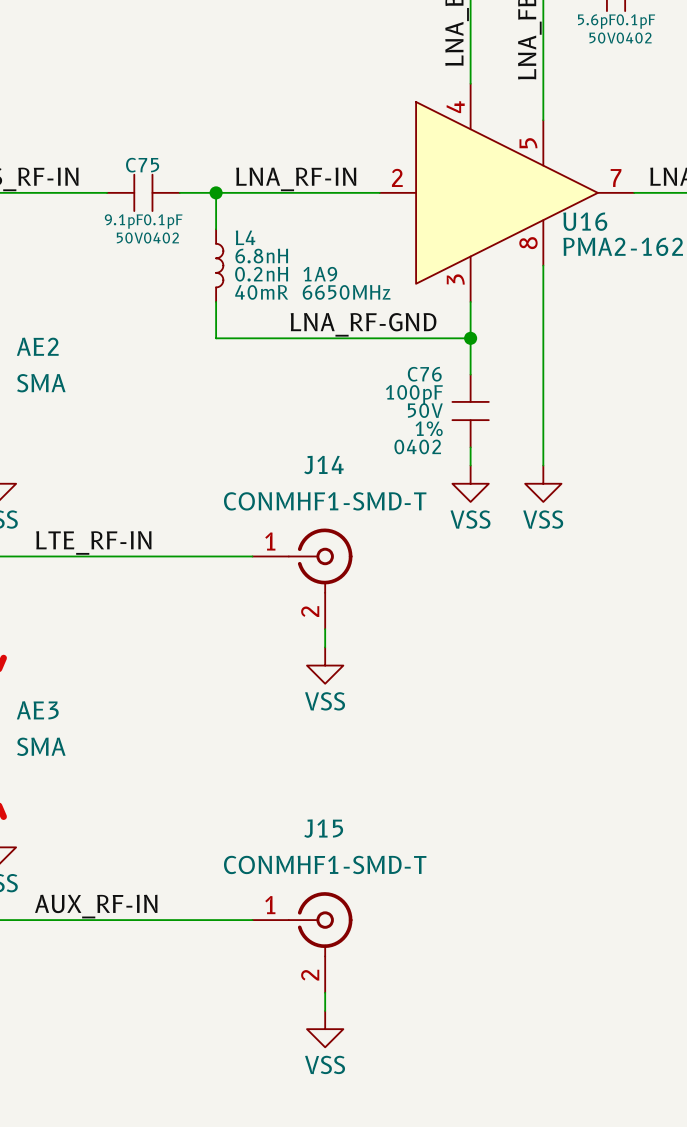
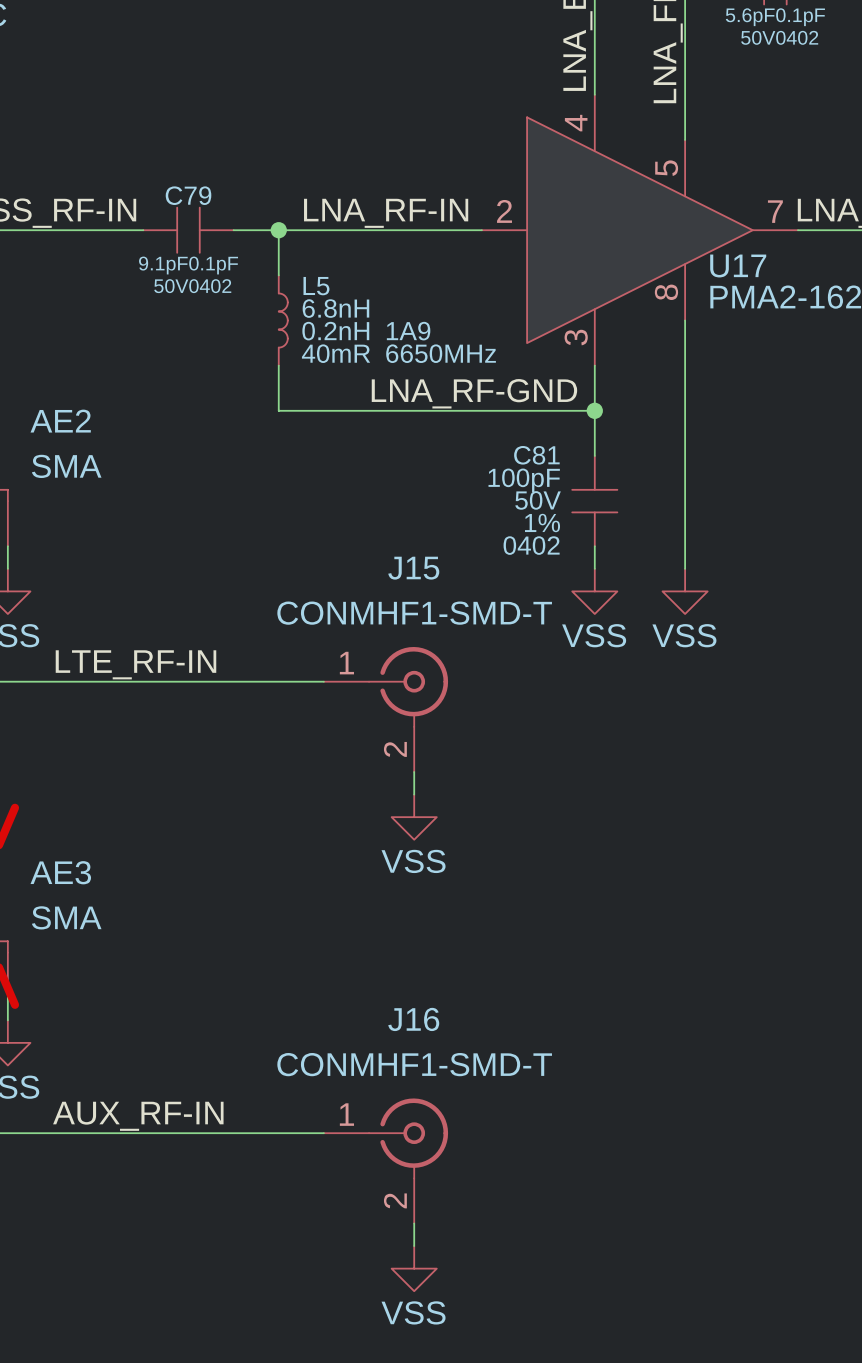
C75 name: C75 (142, 165) -> C79 (188, 195)
U16 name: U16 (585, 221) -> U17 (738, 266)
L4 name: L4 (245, 237) -> L5 (316, 286)
C76 name: C76 (424, 374) -> C81 (536, 455)
J14 name: J14 (323, 465) -> J15 (413, 568)
J15 name: J15 (323, 828) -> J16 (413, 1019)

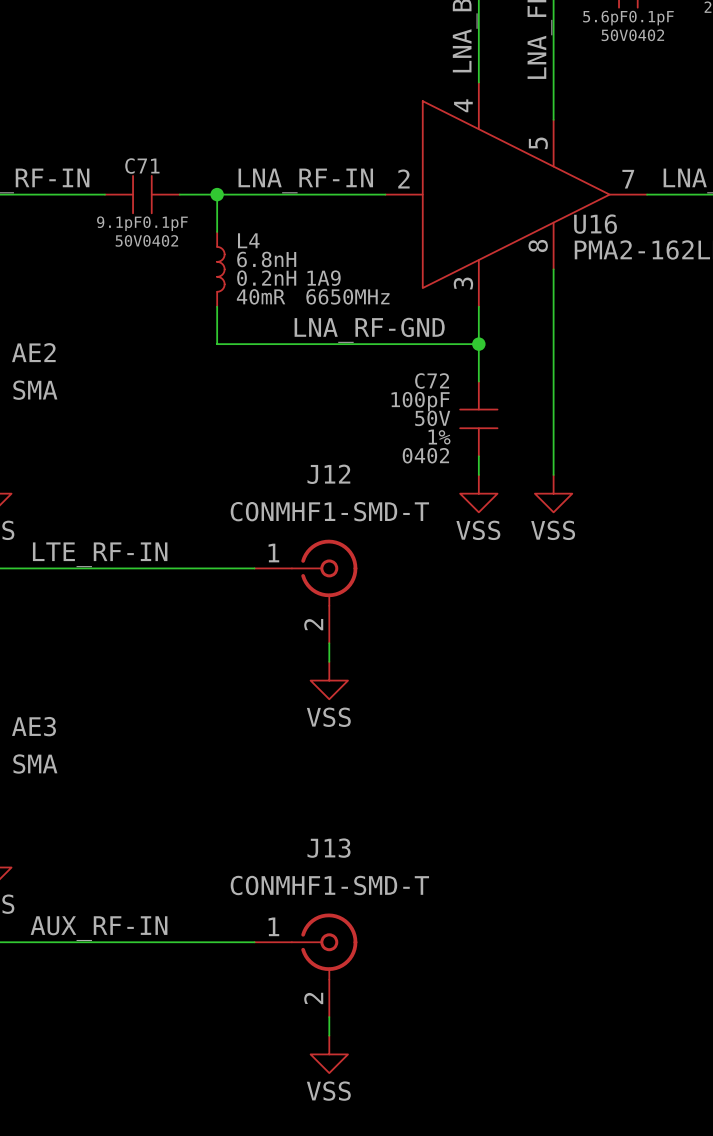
C79 name: C79 (188, 195) -> C71 (142, 166)
U17 name: U17 (738, 266) -> U16 (595, 224)
L5 name: L5 (316, 286) -> L4 (248, 240)
C81 name: C81 (536, 455) -> C72 (432, 380)
J15 name: J15 (413, 568) -> J12 (328, 474)
J16 name: J16 (413, 1019) -> J13 (329, 848)

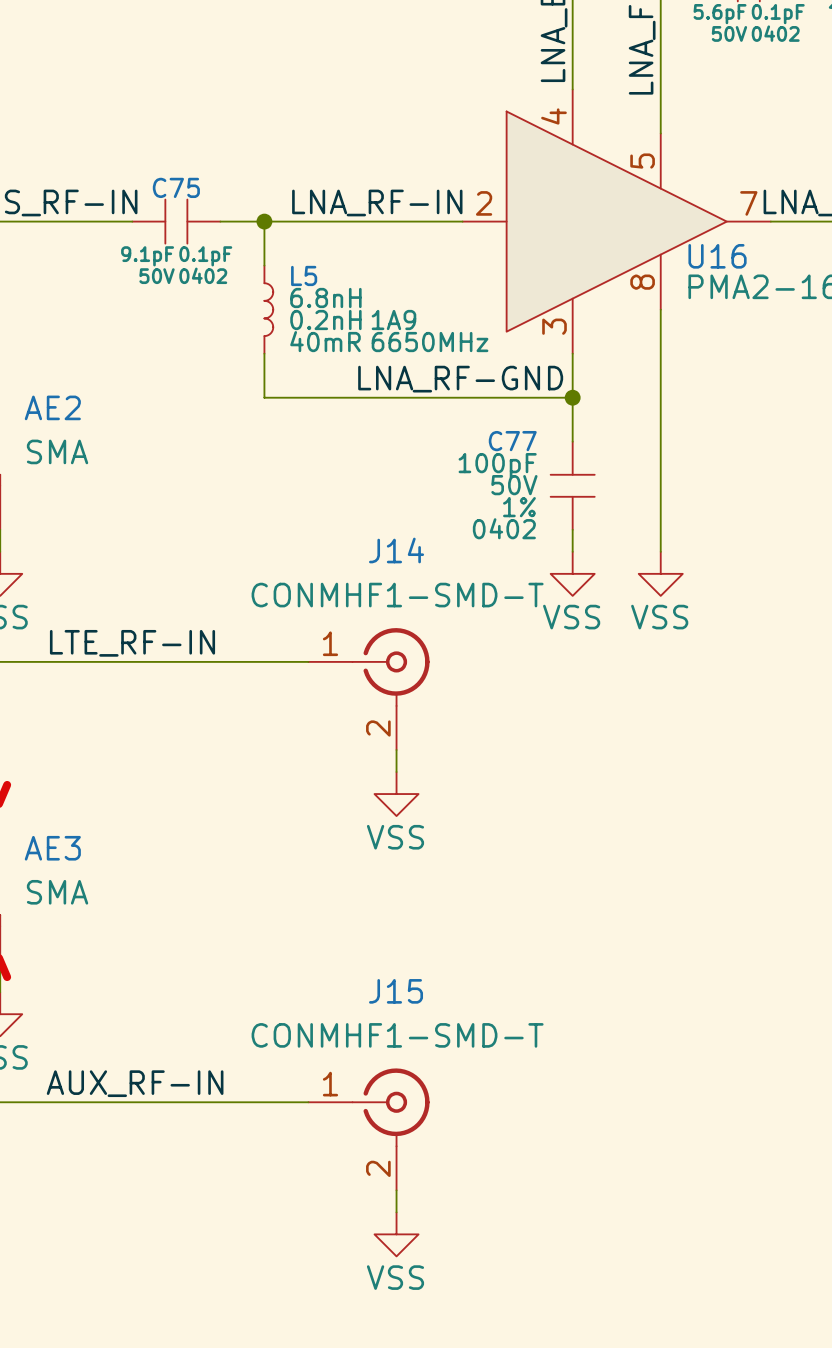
C71 name: C71 (142, 166) -> C75 (176, 187)
L4 name: L4 (248, 240) -> L5 (304, 275)
C72 name: C72 (432, 380) -> C77 (512, 441)
J12 name: J12 (328, 474) -> J14 (396, 550)
J13 name: J13 (329, 848) -> J15 (396, 991)

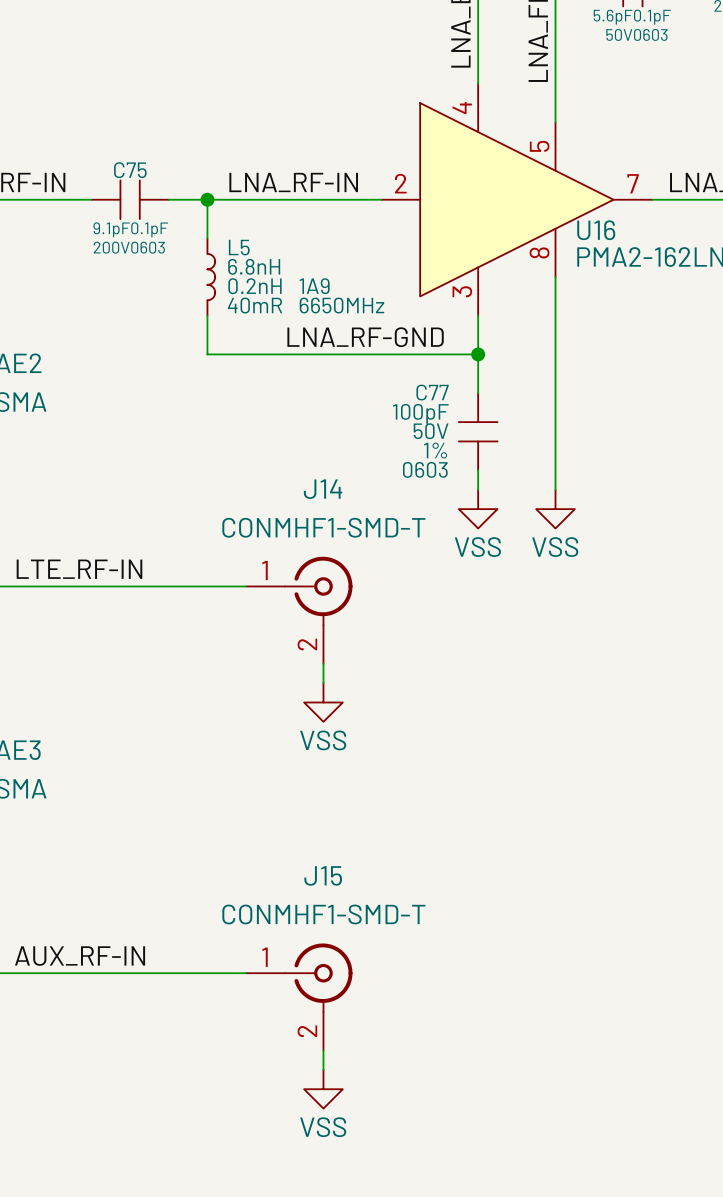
part text: 0402 (775, 33) -> 0603 (650, 34)
C75 text: 0402 (203, 275) -> 0603 (148, 247)
C75 text: 50V (157, 276) -> 200V (111, 247)
C77 text: 0402 (504, 528) -> 0603 (425, 469)

